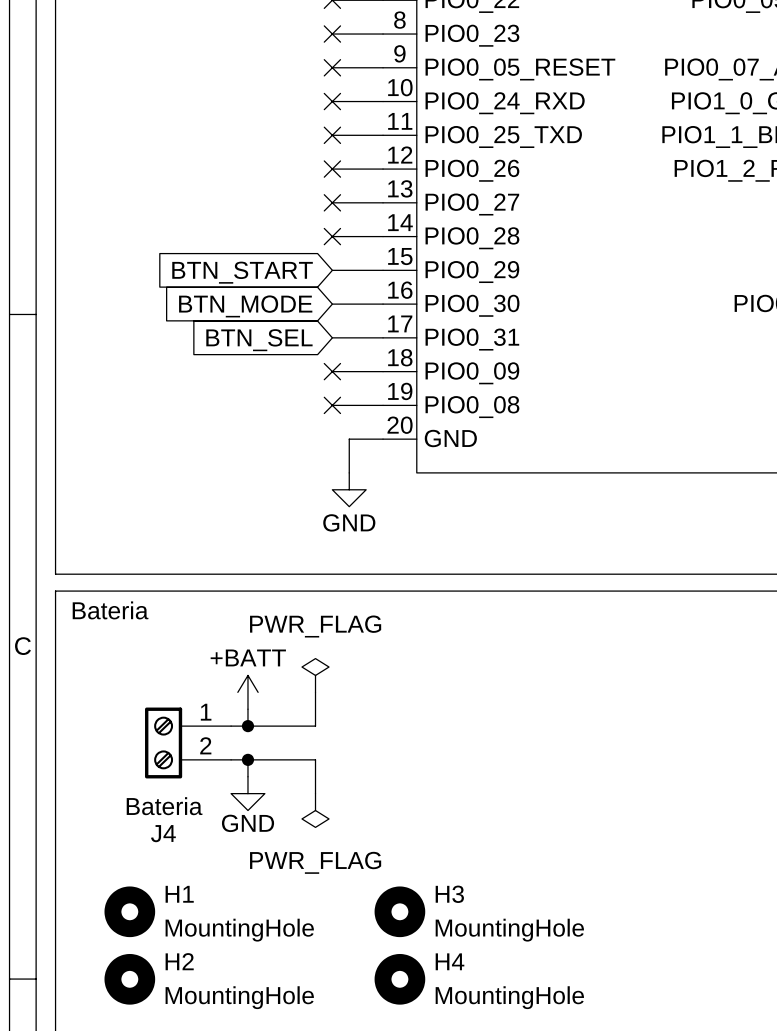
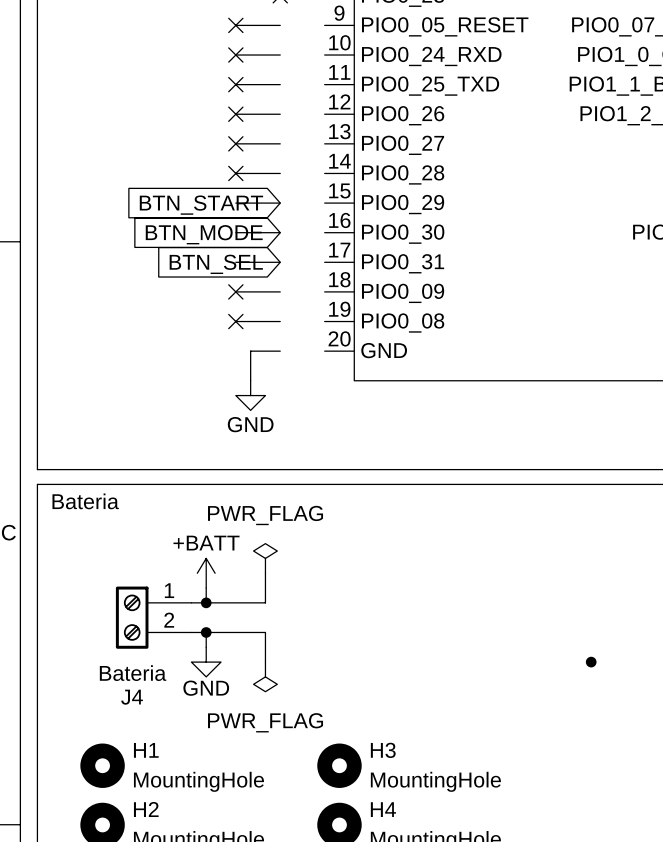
no-connect mark: none -> (235, 25)
wire: (332, 67) (383, 67) -> (280, 25) (235, 25)
no-connect mark: (332, 67) -> none
no-connect mark: none -> (235, 55)
wire: (332, 101) (383, 101) -> (280, 55) (235, 55)
no-connect mark: (332, 101) -> none
no-connect mark: none -> (235, 84)
wire: (332, 135) (383, 135) -> (280, 84) (235, 84)
no-connect mark: (332, 135) -> none
no-connect mark: none -> (235, 114)
wire: (332, 169) (383, 169) -> (280, 114) (235, 114)
no-connect mark: (332, 169) -> none
no-connect mark: none -> (235, 143)
wire: (332, 202) (383, 202) -> (280, 143) (235, 143)
no-connect mark: (332, 202) -> none
no-connect mark: none -> (235, 173)
wire: (332, 236) (383, 236) -> (280, 173) (235, 173)
no-connect mark: (332, 236) -> none
wire: (332, 270) (383, 270) -> (280, 203) (235, 203)
wire: (332, 304) (383, 304) -> (280, 232) (235, 232)
wire: (332, 337) (383, 337) -> (280, 262) (235, 262)
no-connect mark: none -> (235, 291)
wire: (332, 371) (383, 371) -> (280, 291) (235, 291)
no-connect mark: (332, 371) -> none
no-connect mark: none -> (235, 321)
wire: (332, 405) (383, 405) -> (280, 321) (235, 321)
no-connect mark: (332, 405) -> none
wire: (383, 439) (349, 439) (349, 472) -> (280, 351) (250, 351) (250, 380)
power symbol position: GND (349, 489) -> GND (250, 395)
junction: none -> (591, 662)

